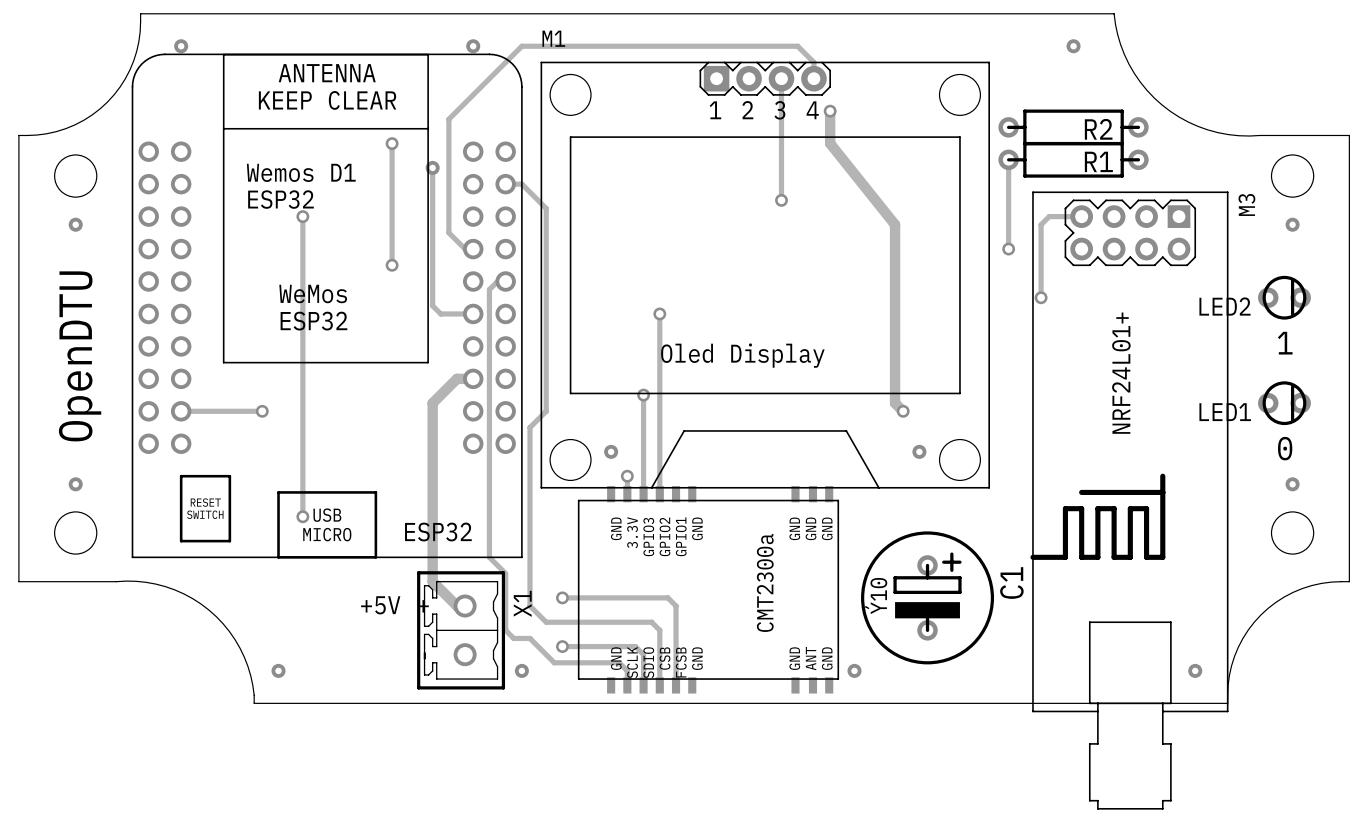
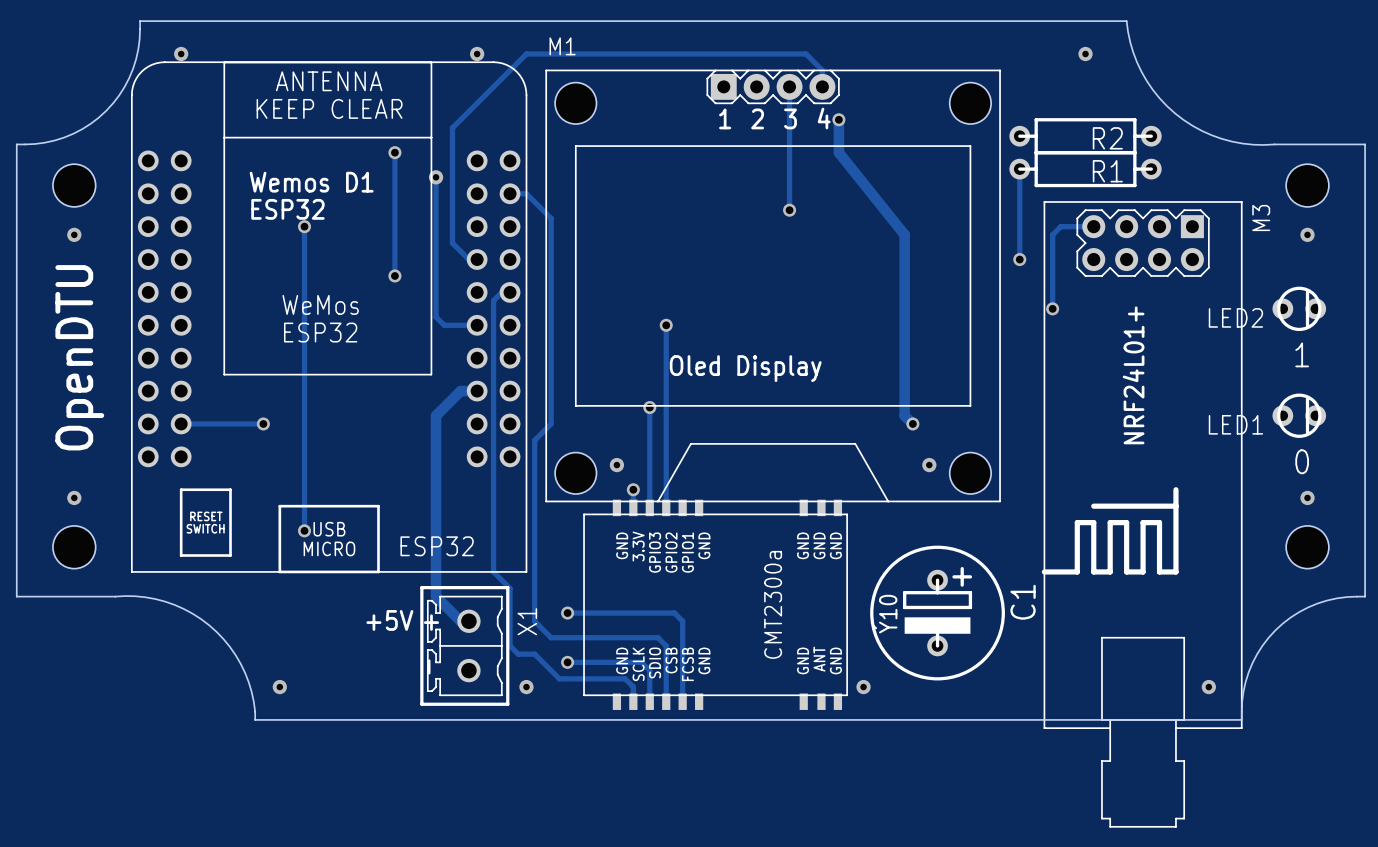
part footprint: [577, 486, 840, 694] -> [583, 499, 848, 710]

